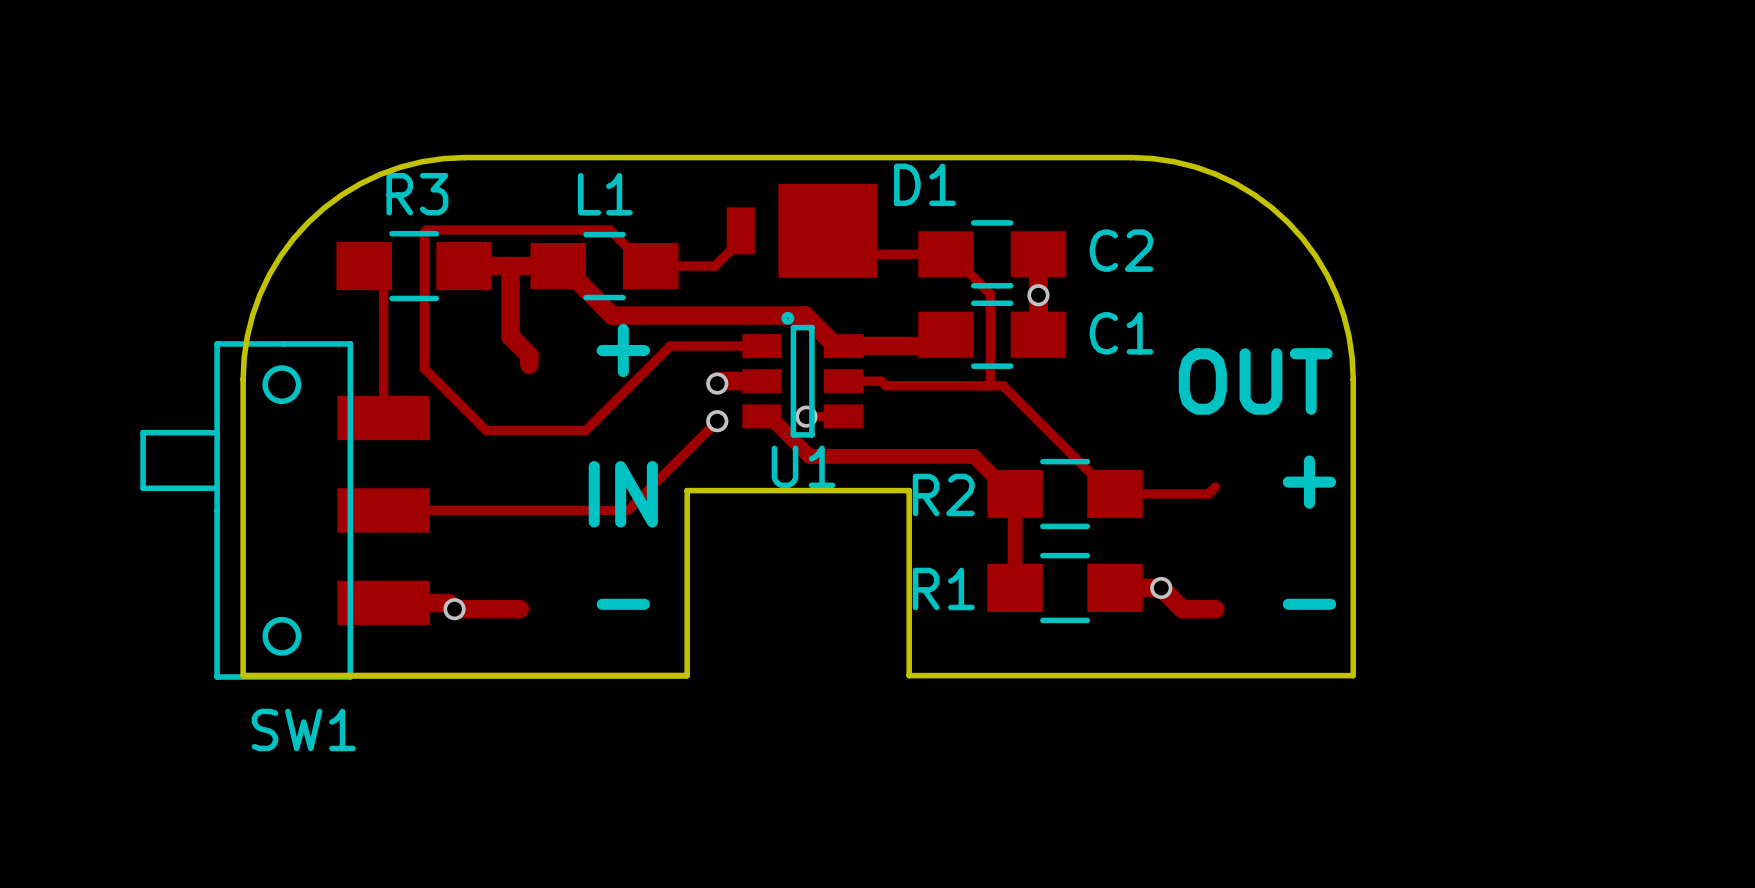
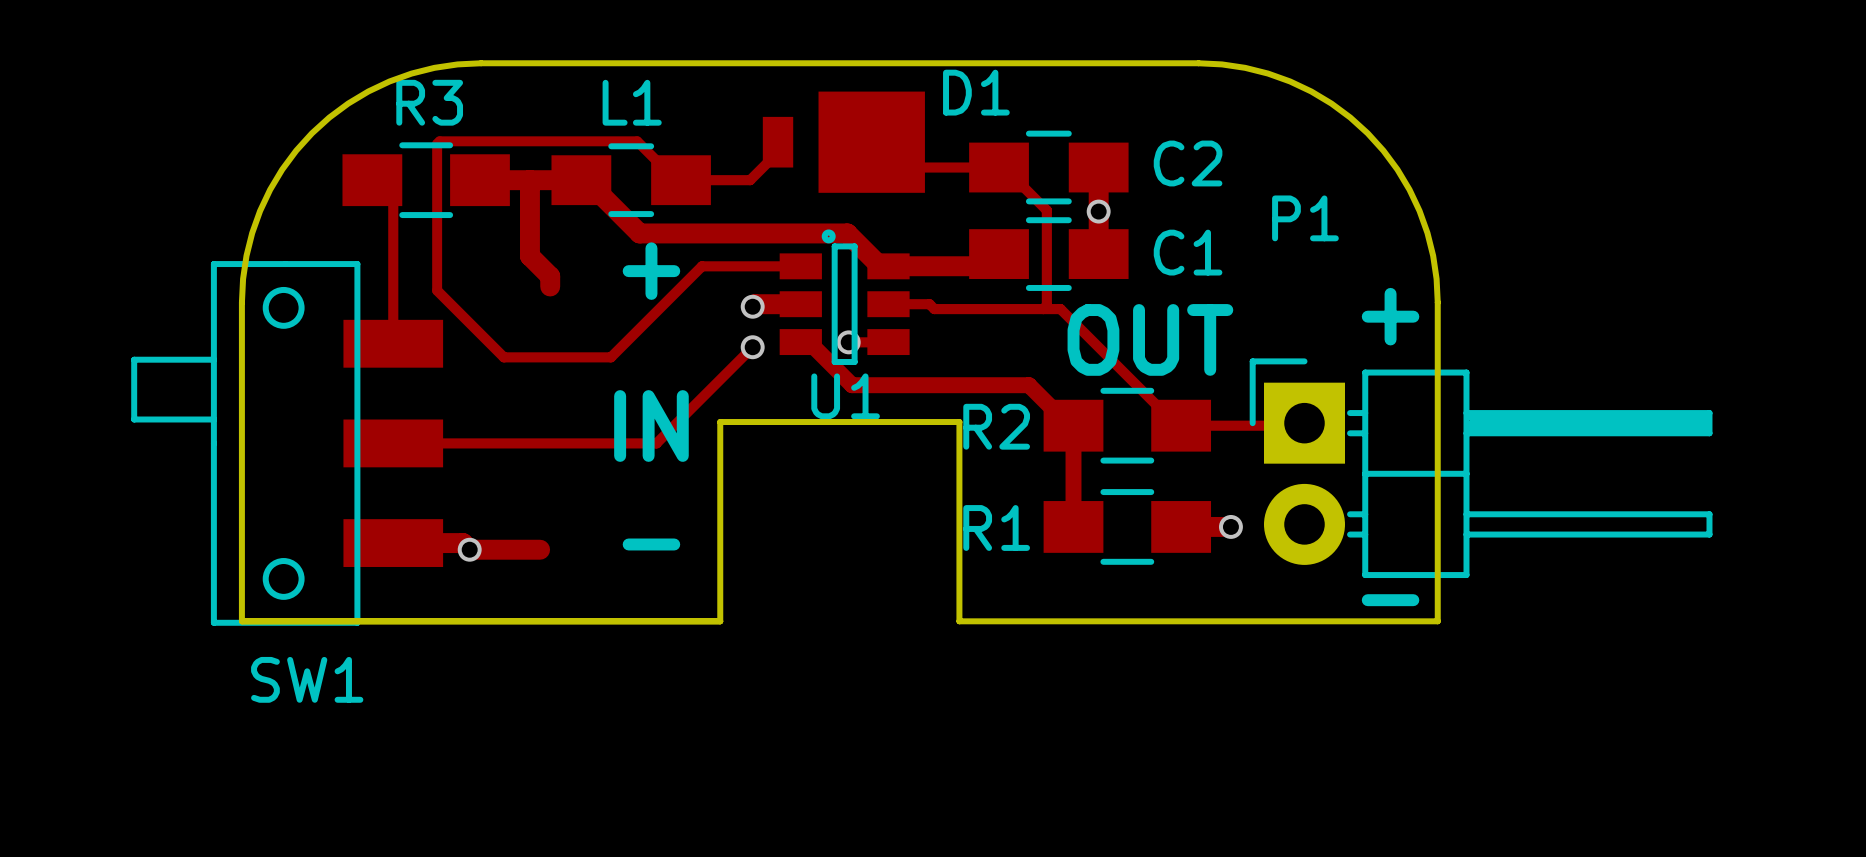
text position: OUT (1255, 381) -> OUT (1150, 339)
text position: + (1309, 482) -> + (1390, 316)
P1: none -> (1481, 468)
track: (1161, 588) (1182, 609) (1215, 609) -> none
text position: - (1309, 604) -> - (1390, 600)

